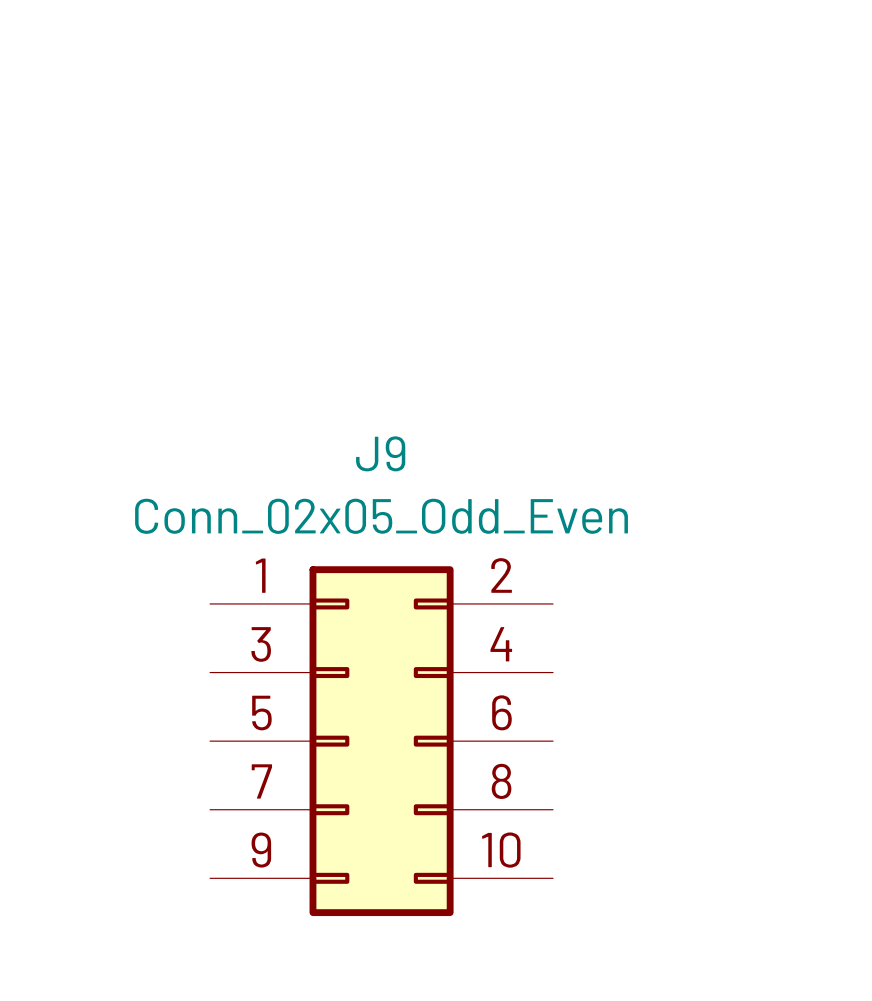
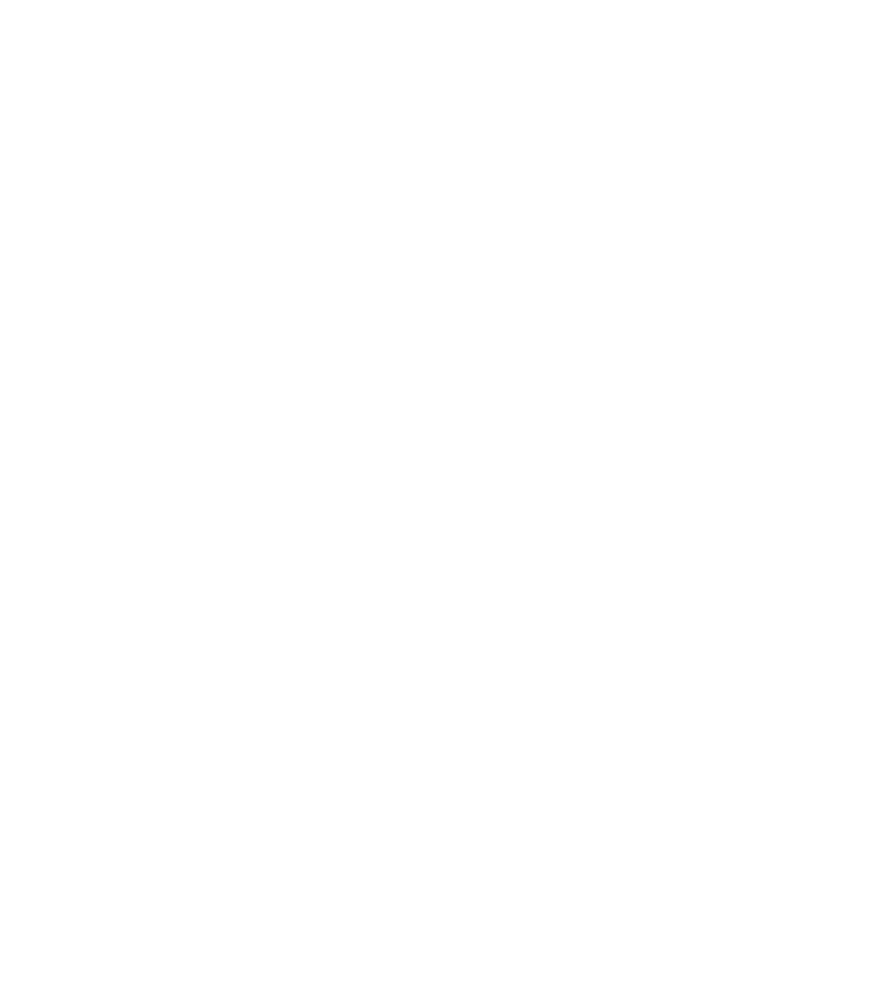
J9: Conn_02x05_Odd_Even (381, 741) -> none

